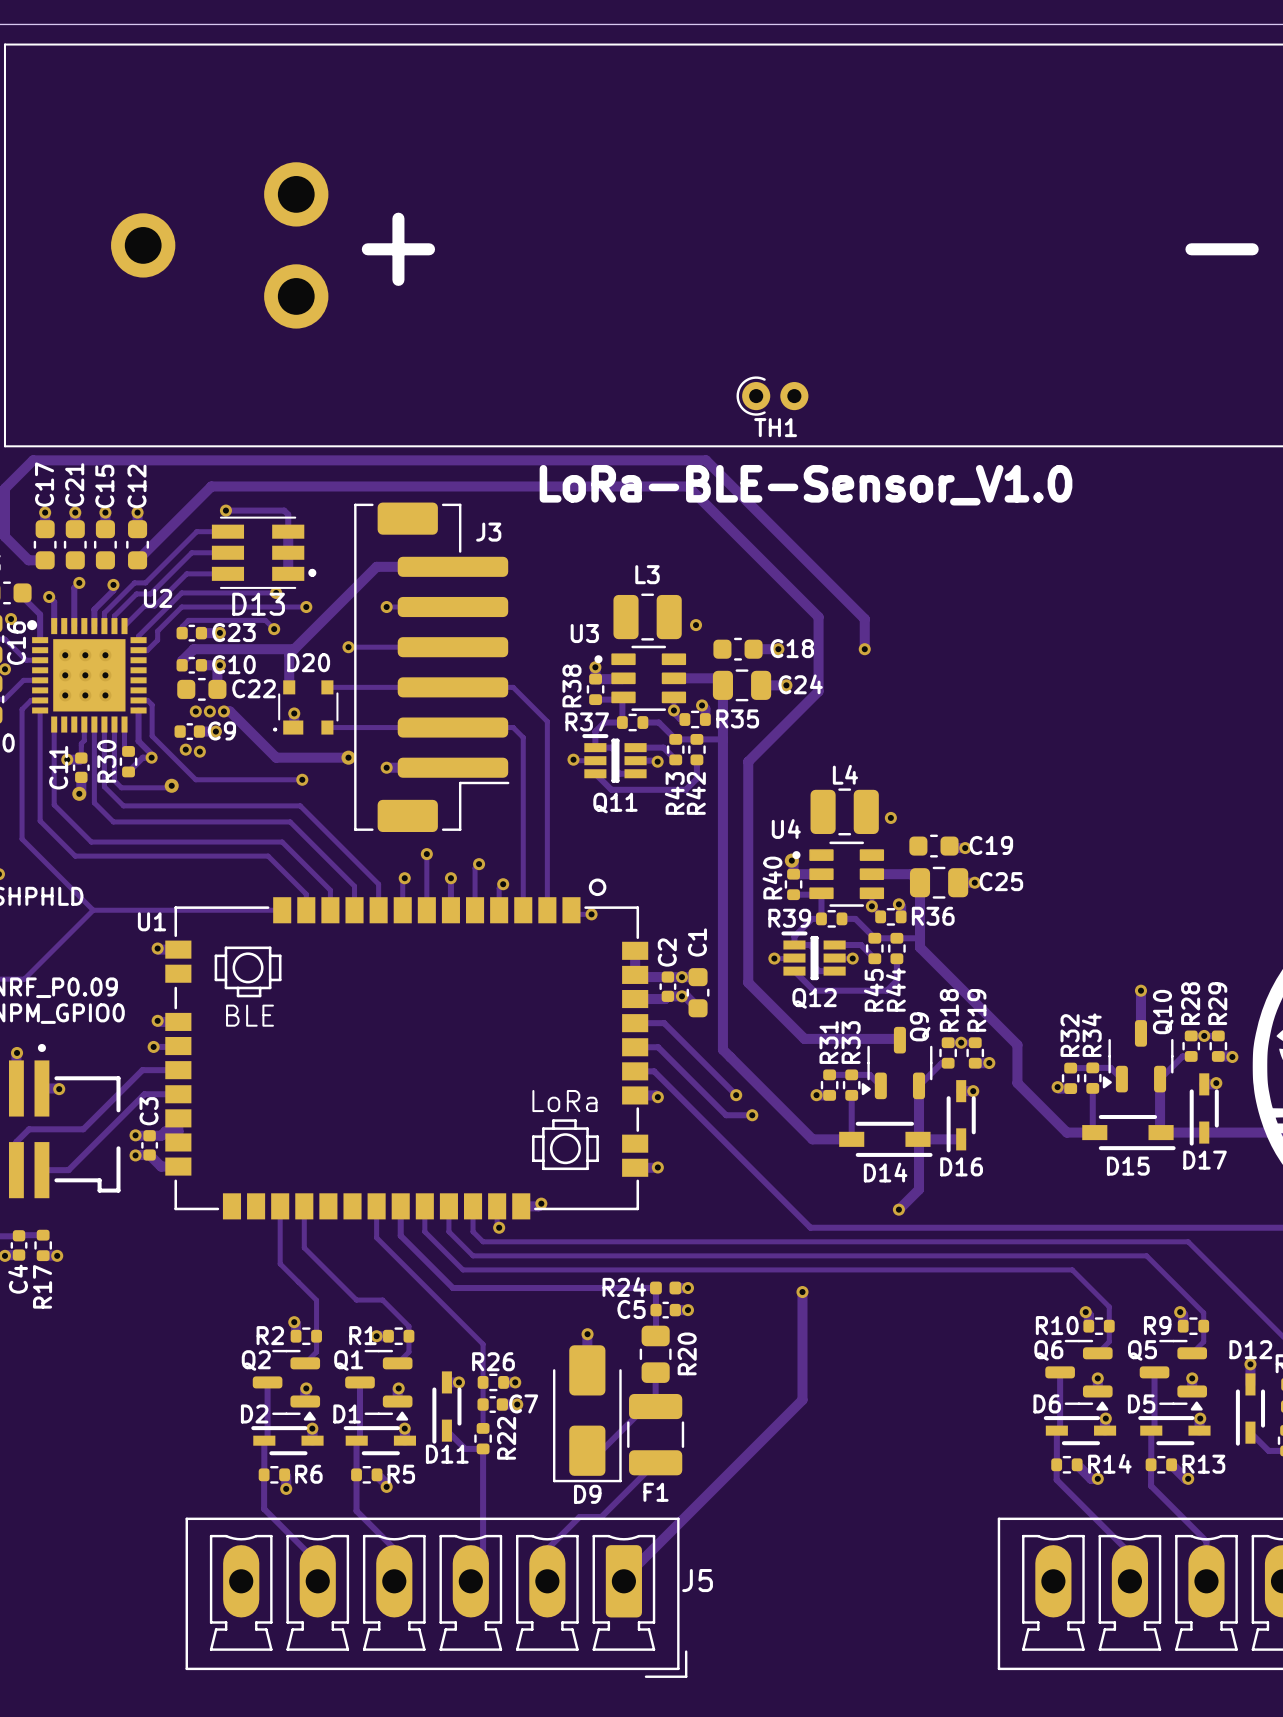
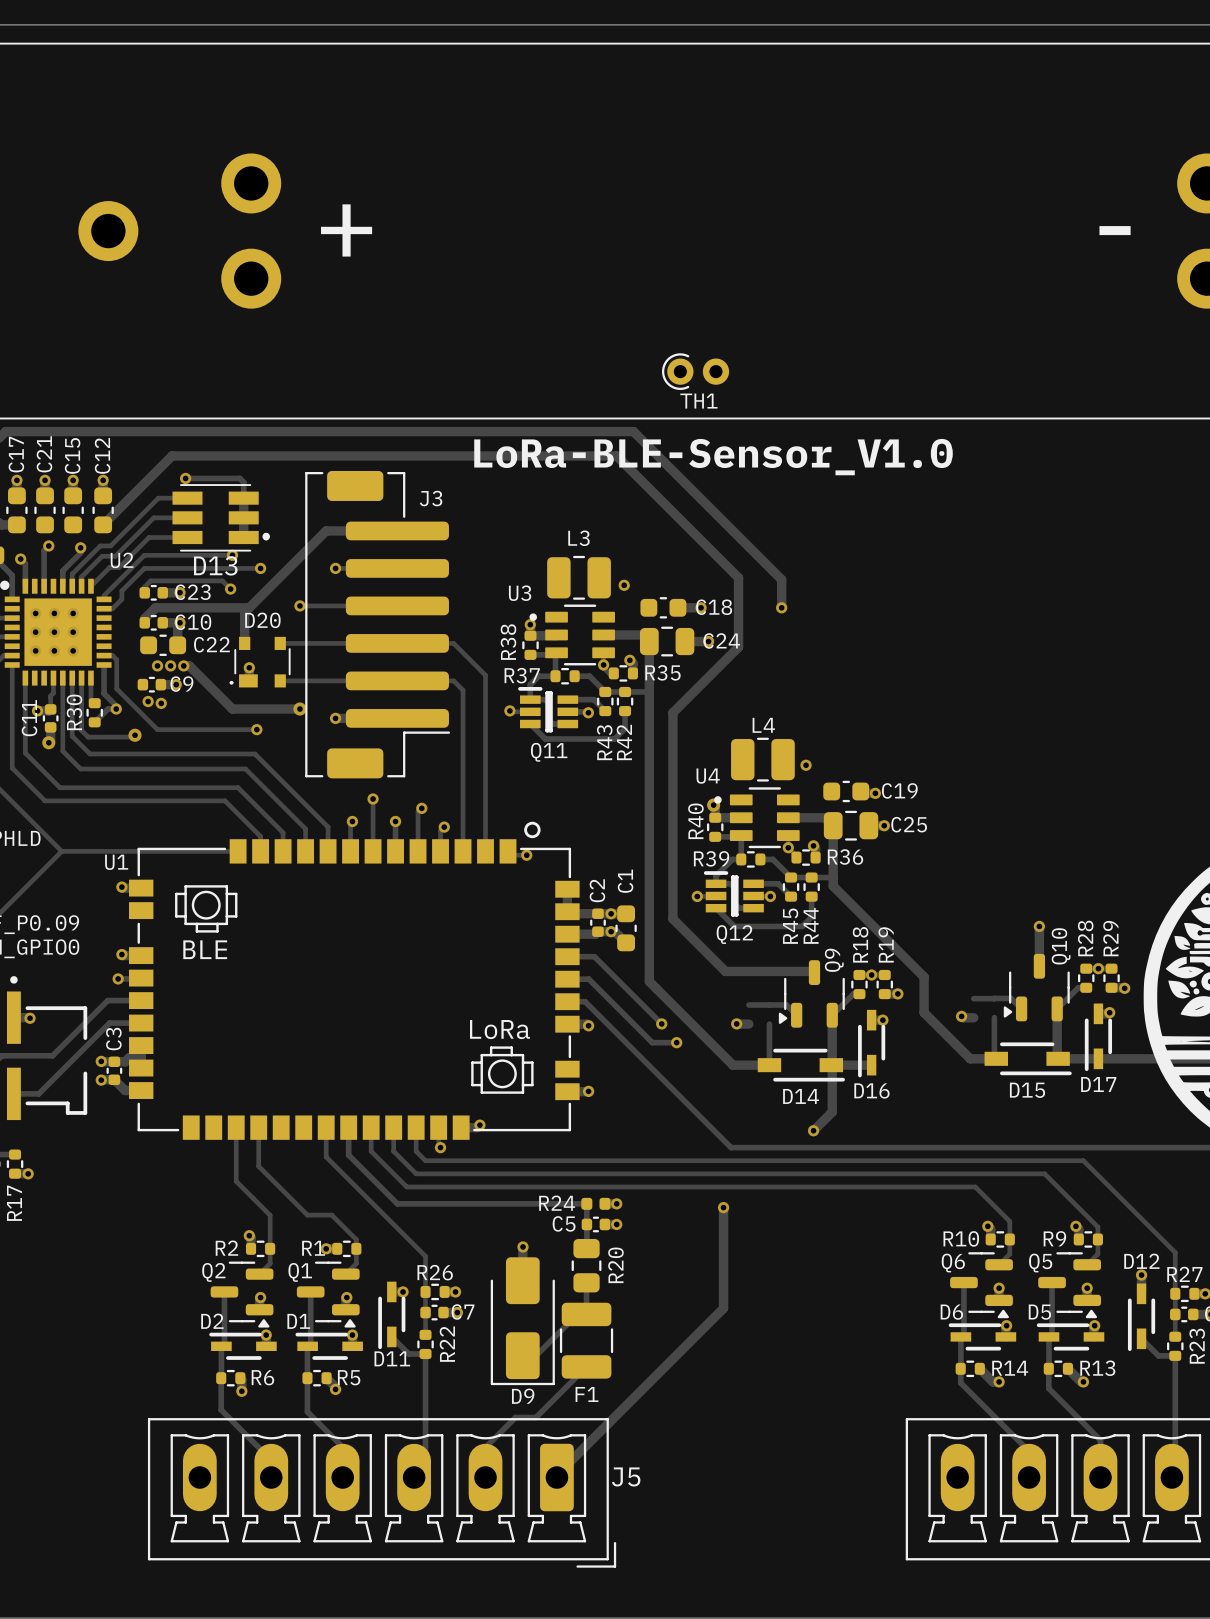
R32: (1070, 1078) -> none
R34: (1092, 1078) -> none
R31: (829, 1085) -> none
R33: (851, 1085) -> none

